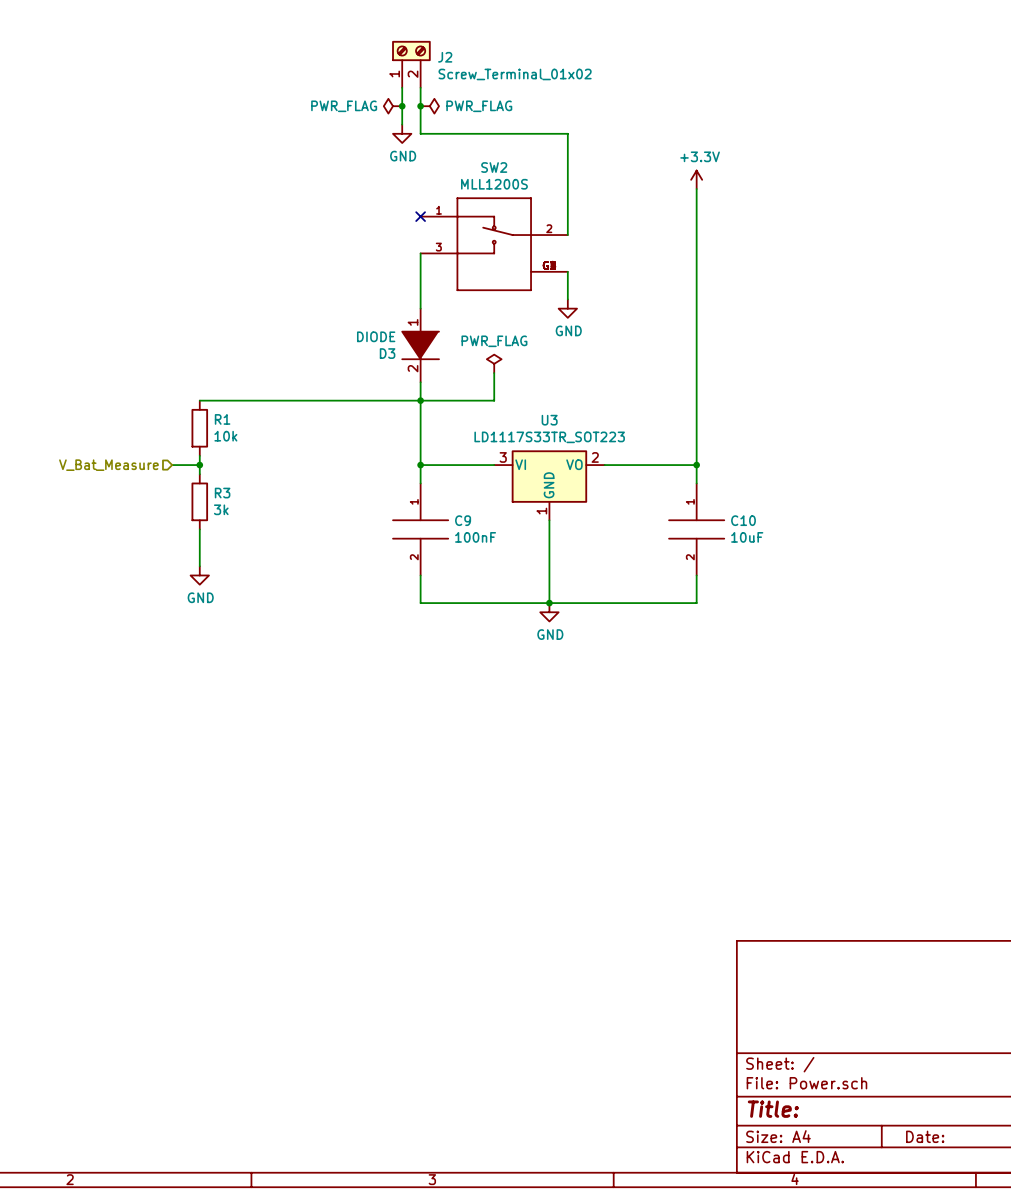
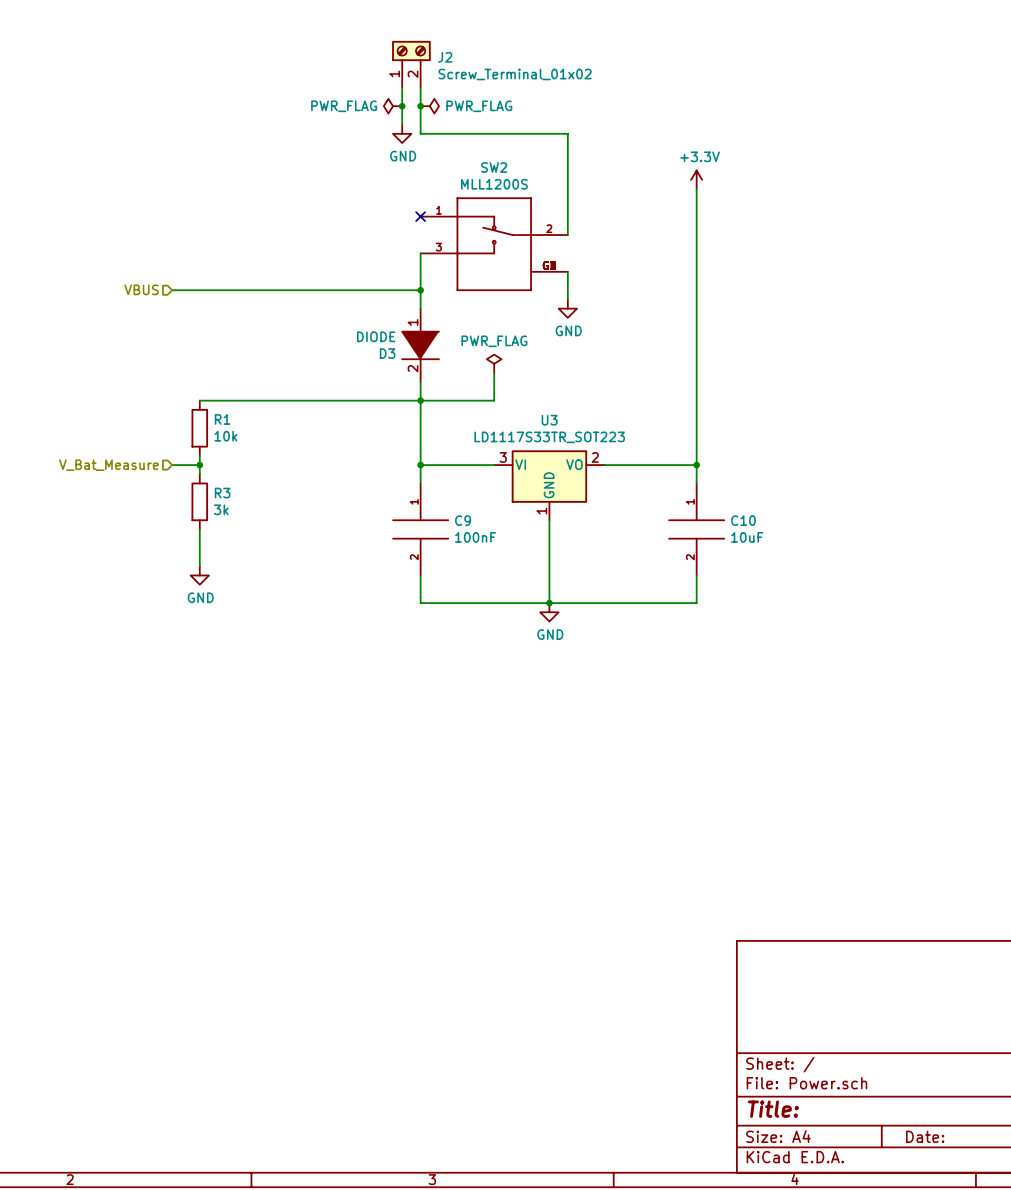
hierarchical label: none -> VBUS (141, 289)
wire: none -> (172, 290) (420, 290)
junction: none -> (420, 290)

